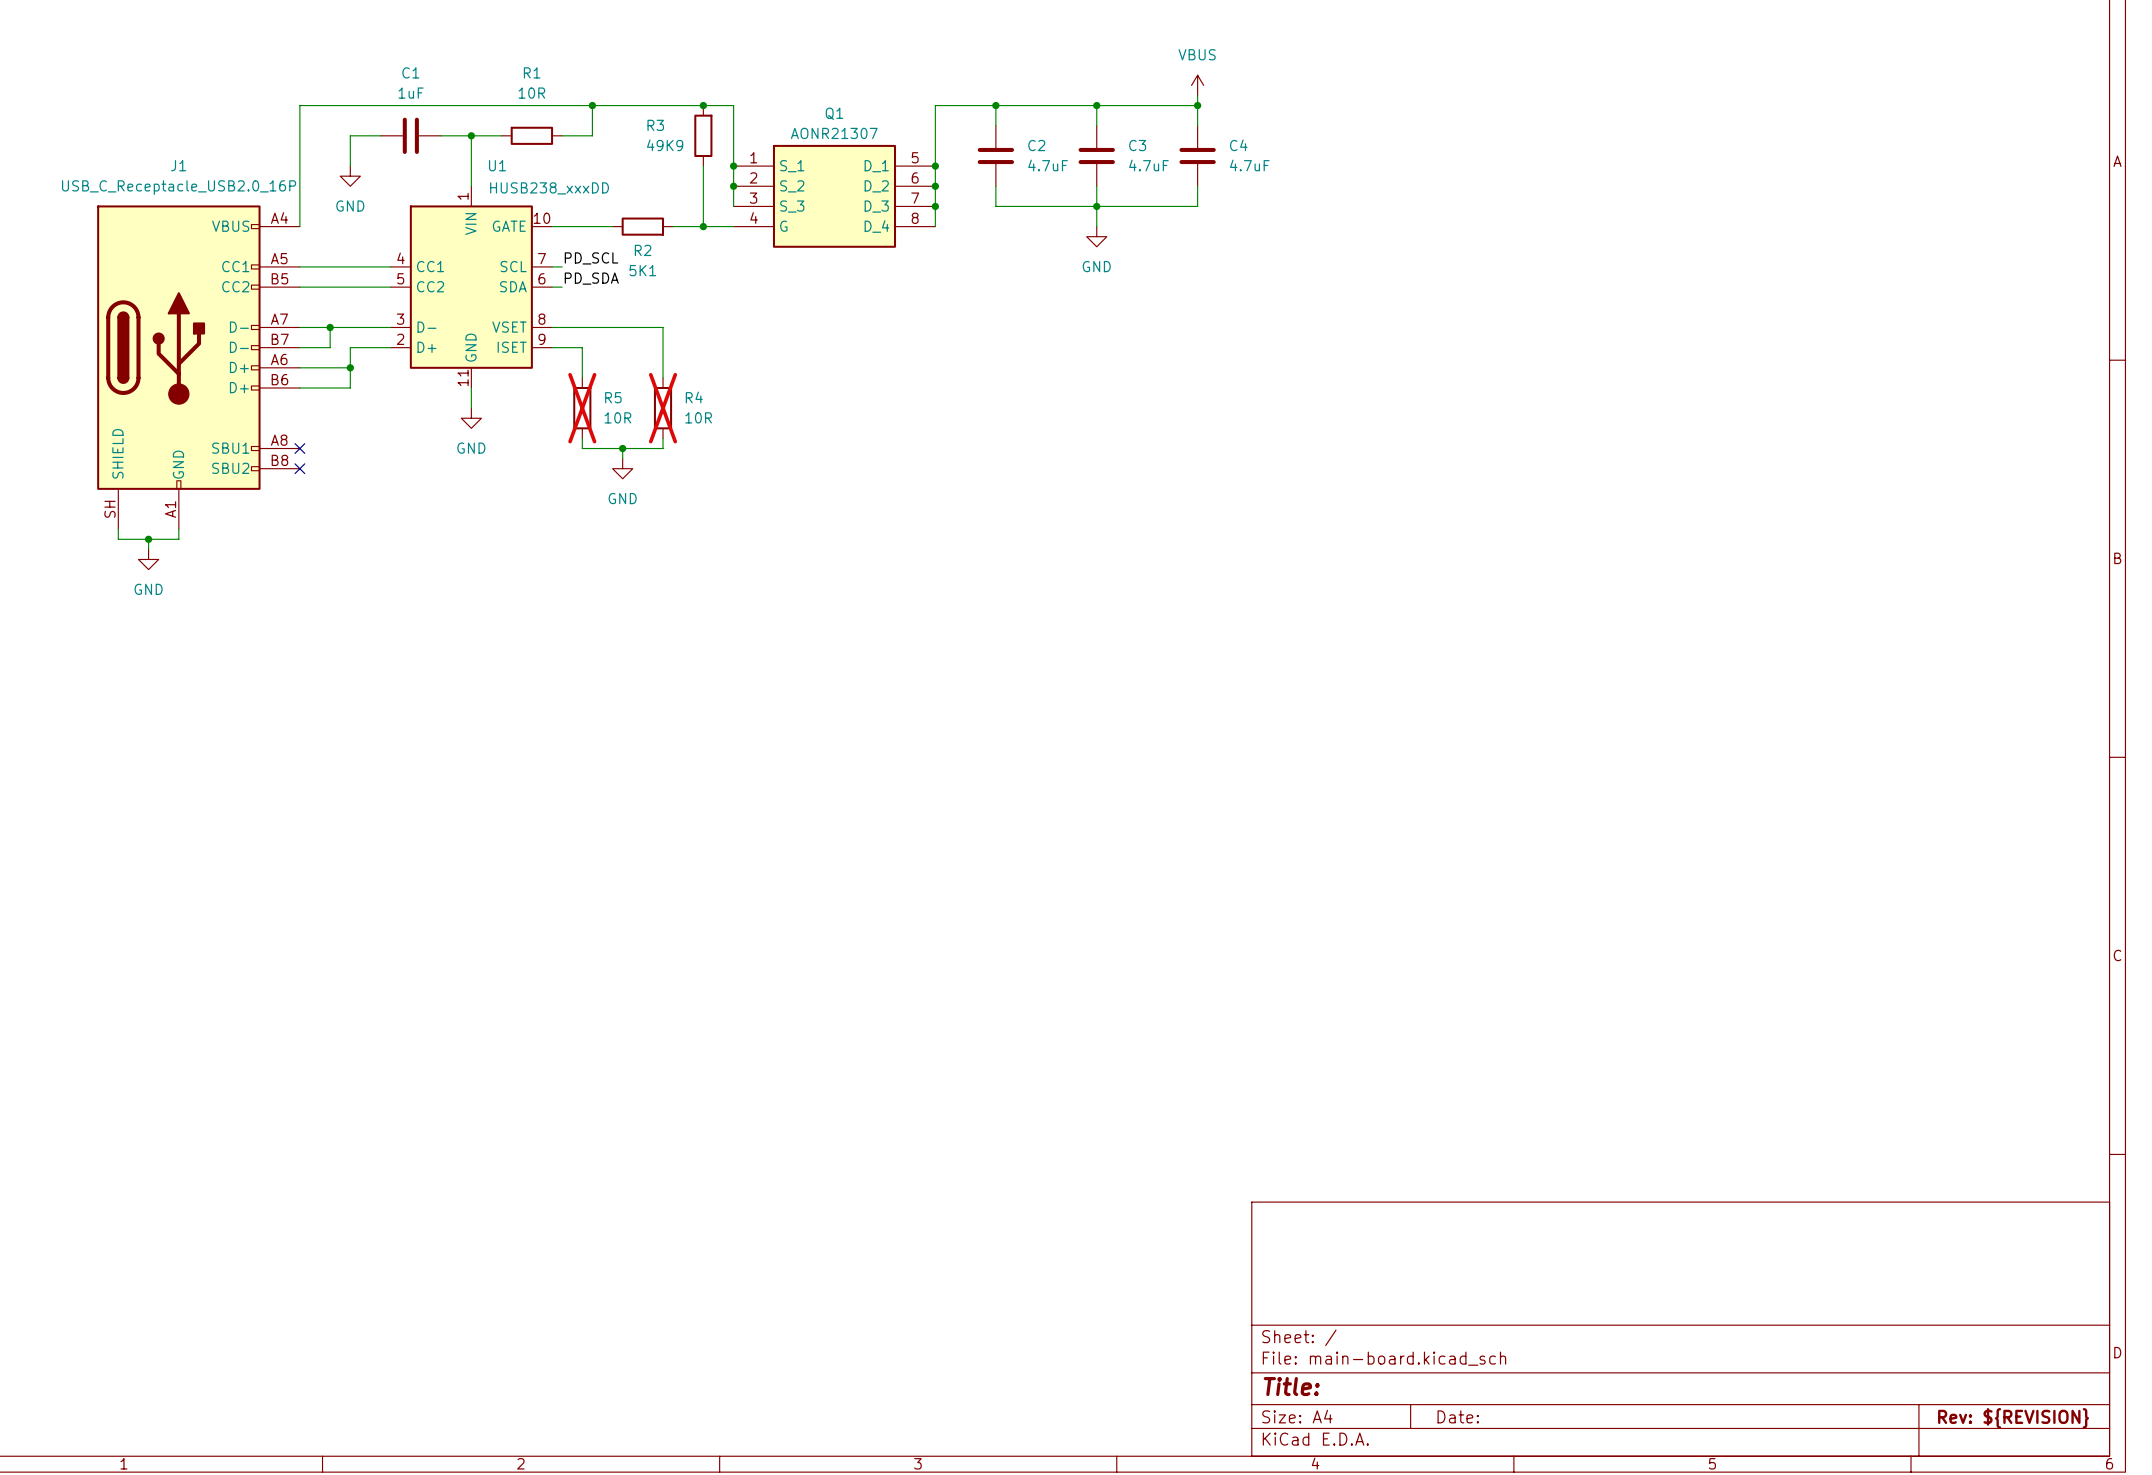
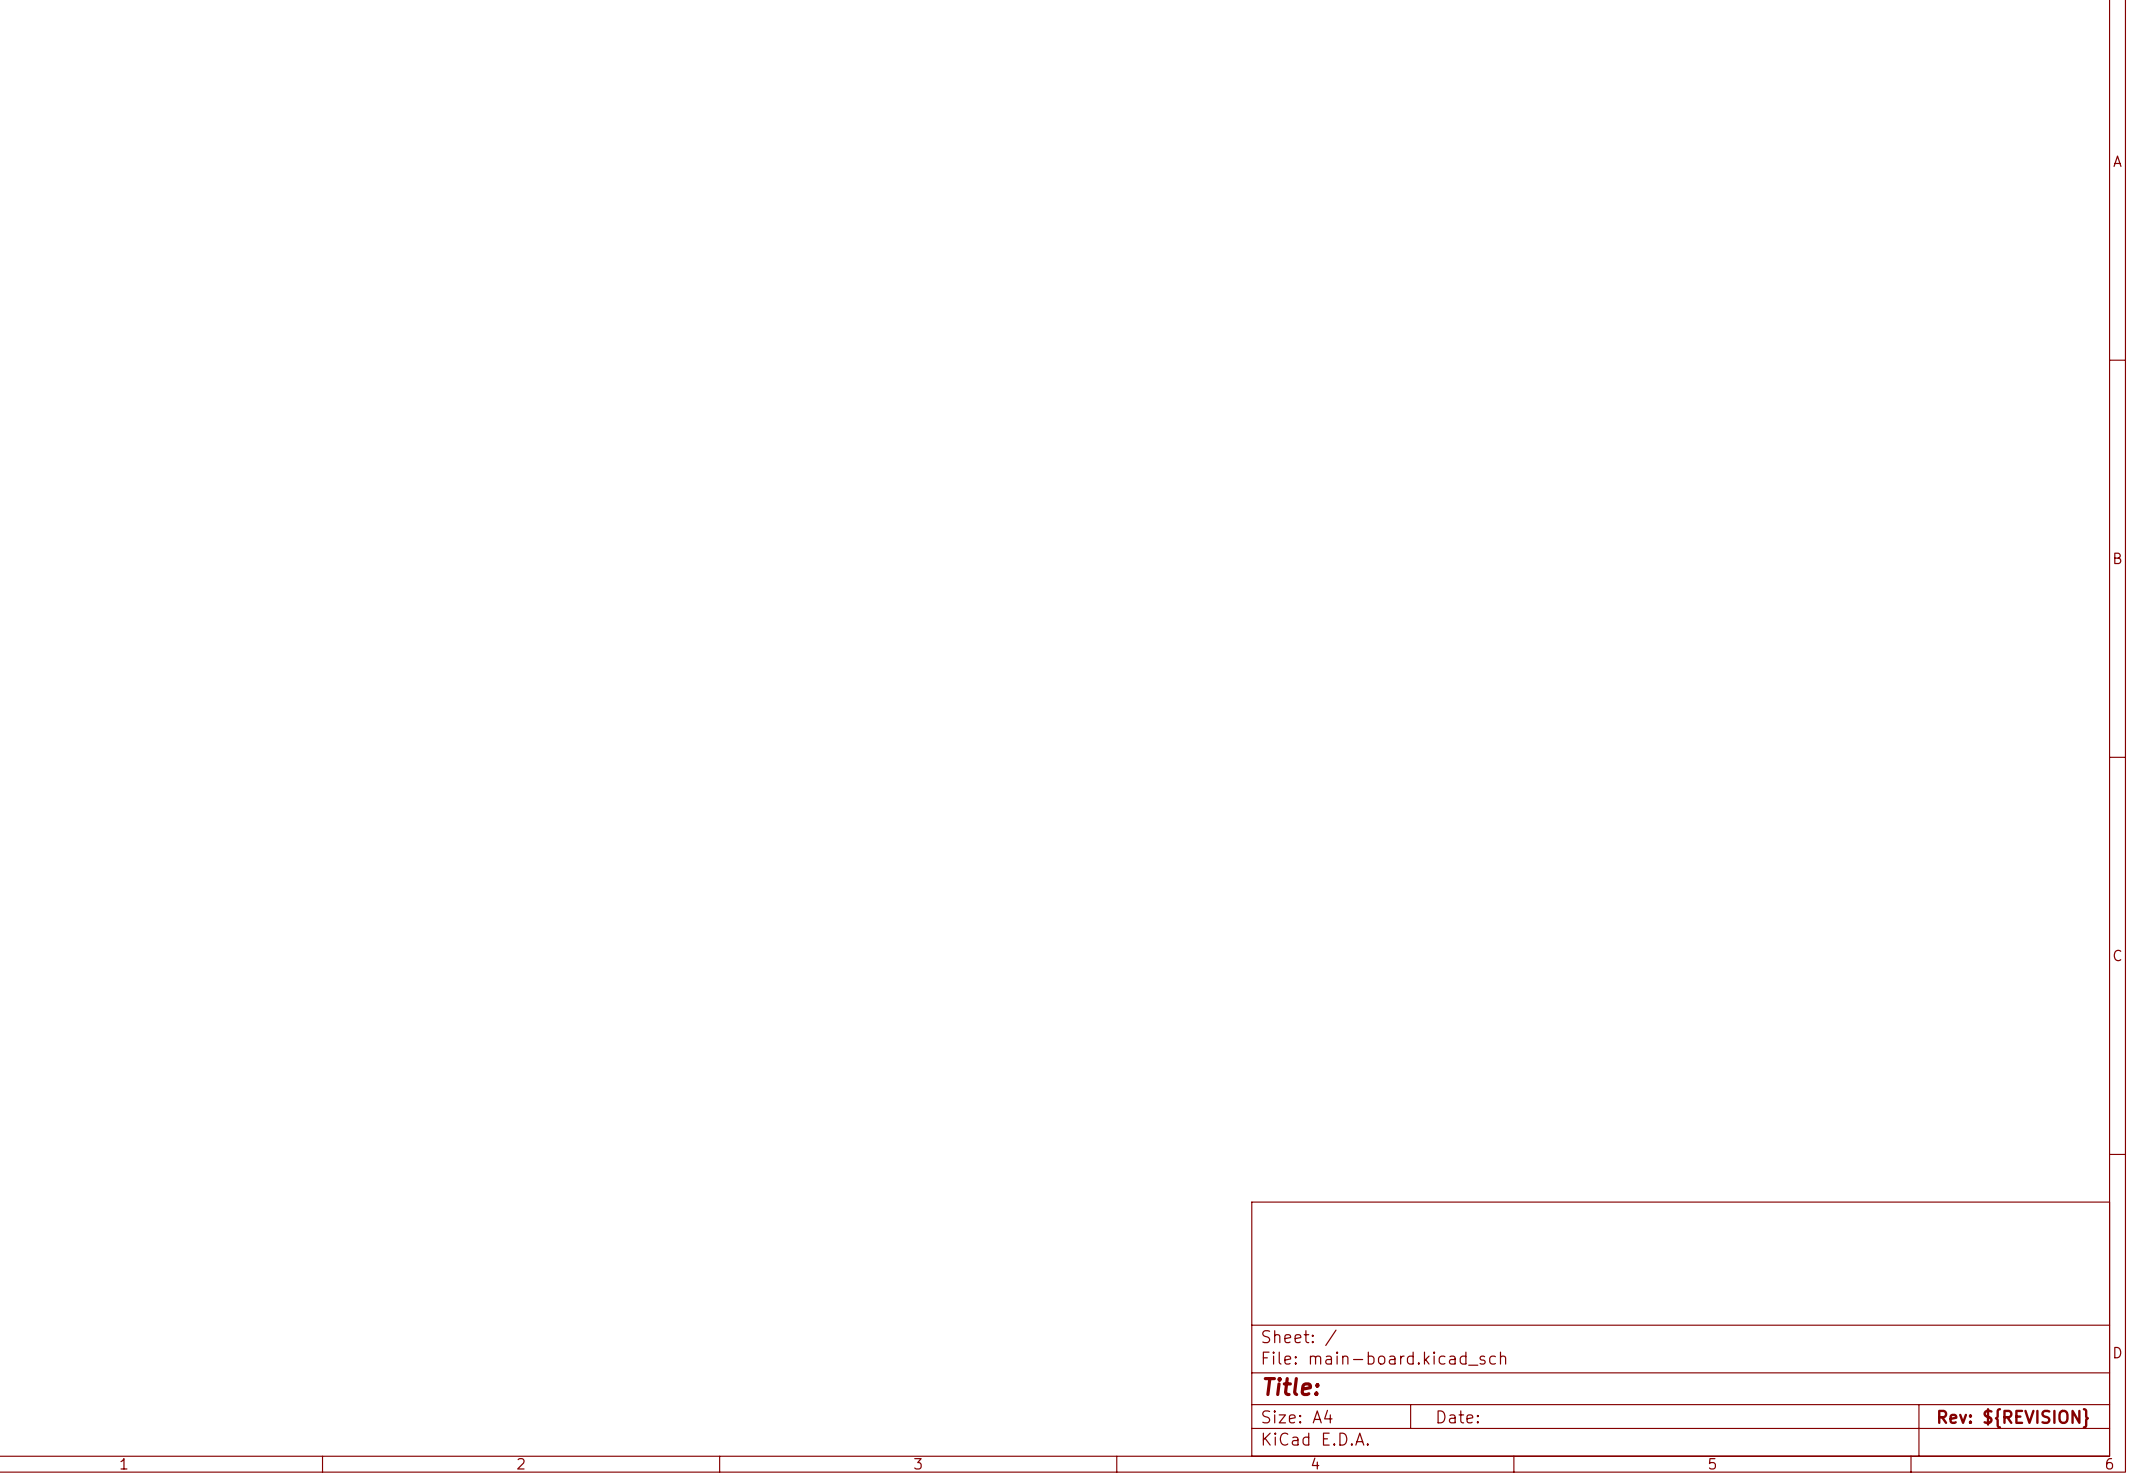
power symbol: VBUS (1197, 85) -> none
wire: (1197, 95) (1197, 125) -> none
wire: (592, 105) (592, 135) (562, 135) -> none
junction: (592, 105) -> none
junction: (703, 105) -> none
wire: (995, 105) (995, 125) -> none
junction: (995, 105) -> none
wire: (1096, 105) (1096, 125) -> none
junction: (1096, 105) -> none
wire: (1197, 105) (935, 105) (935, 226) -> none
junction: (1197, 105) -> none
wire: (380, 135) (350, 135) (350, 166) -> none
C1: 1uF (410, 135) -> none
wire: (441, 135) (501, 135) -> none
wire: (471, 135) (471, 186) -> none
junction: (471, 135) -> none
R1: 10R (531, 135) -> none
R3: 49K9 (703, 135) -> none
C2: 4.7uF (995, 156) -> none
C3: 4.7uF (1096, 156) -> none
C4: 4.7uF (1197, 156) -> none
wire: (703, 166) (703, 226) -> none
junction: (733, 166) -> none
junction: (935, 166) -> none
power symbol: GND (350, 176) -> none
junction: (733, 186) -> none
junction: (935, 186) -> none
wire: (995, 186) (995, 206) (1197, 206) (1197, 186) -> none
wire: (1096, 186) (1096, 226) -> none
Q1: AONR21307 (834, 196) -> none
wire: (733, 206) (733, 105) (299, 105) (299, 226) -> none
junction: (935, 206) -> none
junction: (1096, 206) -> none
wire: (552, 226) (612, 226) -> none
R2: 5K1 (642, 226) -> none
wire: (673, 226) (733, 226) -> none
junction: (703, 226) -> none
power symbol: GND (1096, 236) -> none
label: PD_SCL (591, 258) -> none
wire: (299, 266) (390, 266) -> none
wire: (552, 266) (562, 266) -> none
label: PD_SDA (591, 278) -> none
wire: (299, 287) (390, 287) -> none
U1: HUSB238_xxxDD (471, 287) -> none
wire: (552, 287) (562, 287) -> none
wire: (299, 327) (390, 327) -> none
wire: (330, 327) (330, 347) (299, 347) -> none
junction: (330, 327) -> none
wire: (552, 327) (663, 327) (663, 377) -> none
wire: (390, 347) (350, 347) (350, 387) (299, 387) -> none
wire: (552, 347) (582, 347) (582, 377) -> none
J1: USB_C_Receptacle_USB2.0_16P (198, 367) -> none
wire: (299, 367) (350, 367) -> none
junction: (350, 367) -> none
wire: (471, 387) (471, 408) -> none
R5: 10R (582, 408) -> none
R4: 10R (663, 408) -> none
power symbol: GND (471, 418) -> none
wire: (582, 438) (582, 448) (663, 448) (663, 438) -> none
no-connect mark: (299, 448) -> none
wire: (622, 448) (622, 458) -> none
junction: (622, 448) -> none
no-connect mark: (299, 468) -> none
power symbol: GND (622, 468) -> none
wire: (118, 529) (118, 539) (178, 539) (178, 529) -> none
wire: (148, 539) (148, 549) -> none
junction: (148, 539) -> none
power symbol: GND (148, 559) -> none

